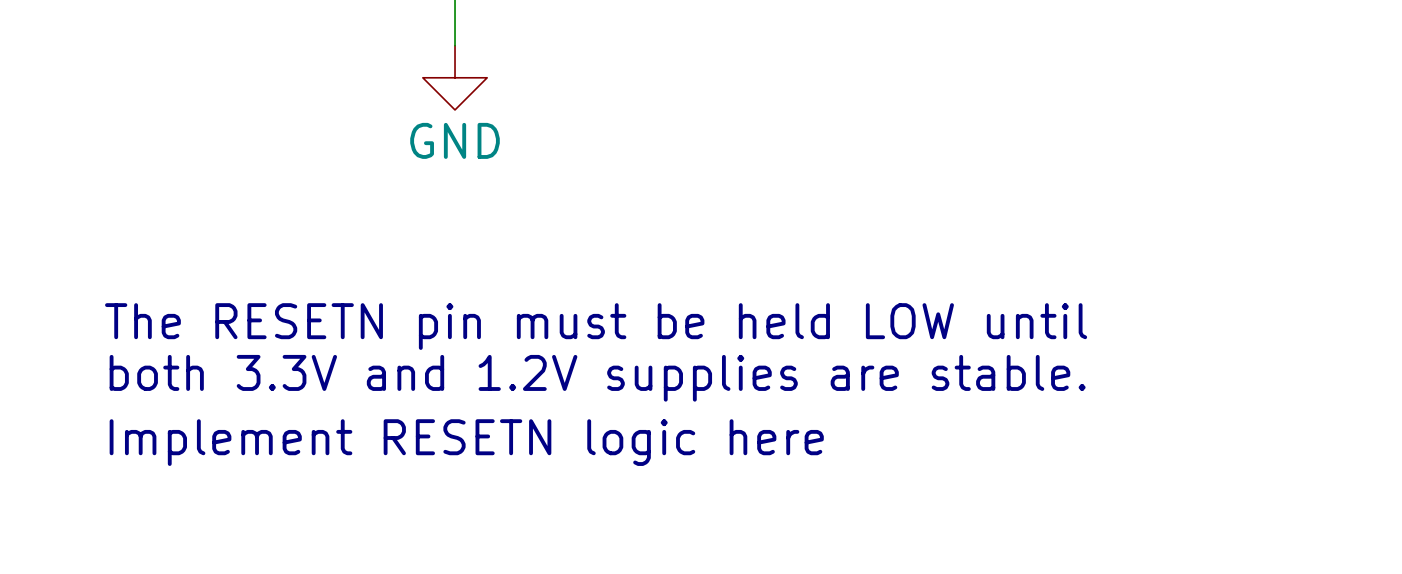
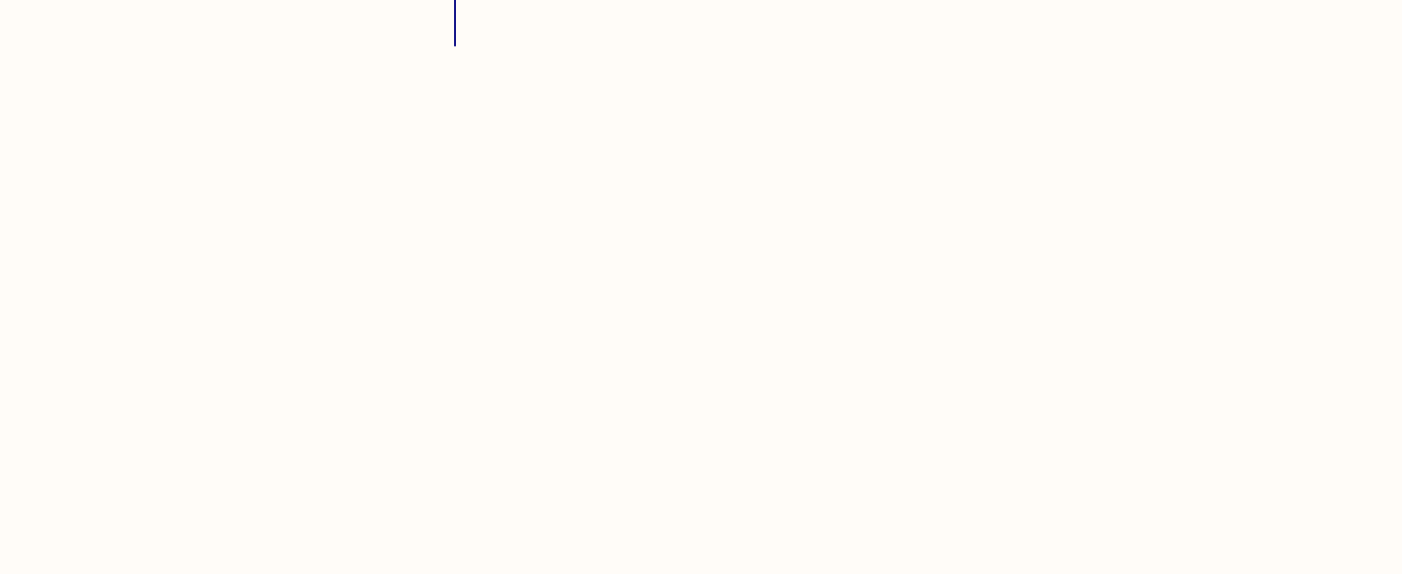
power symbol: GND (455, 77) -> none
text: The RESETN pin must be held LOW until (596, 326) -> none
text: both 3.3V and 1.2V supplies are stable. (597, 378) -> none
text: Implement RESETN logic here (466, 442) -> none

